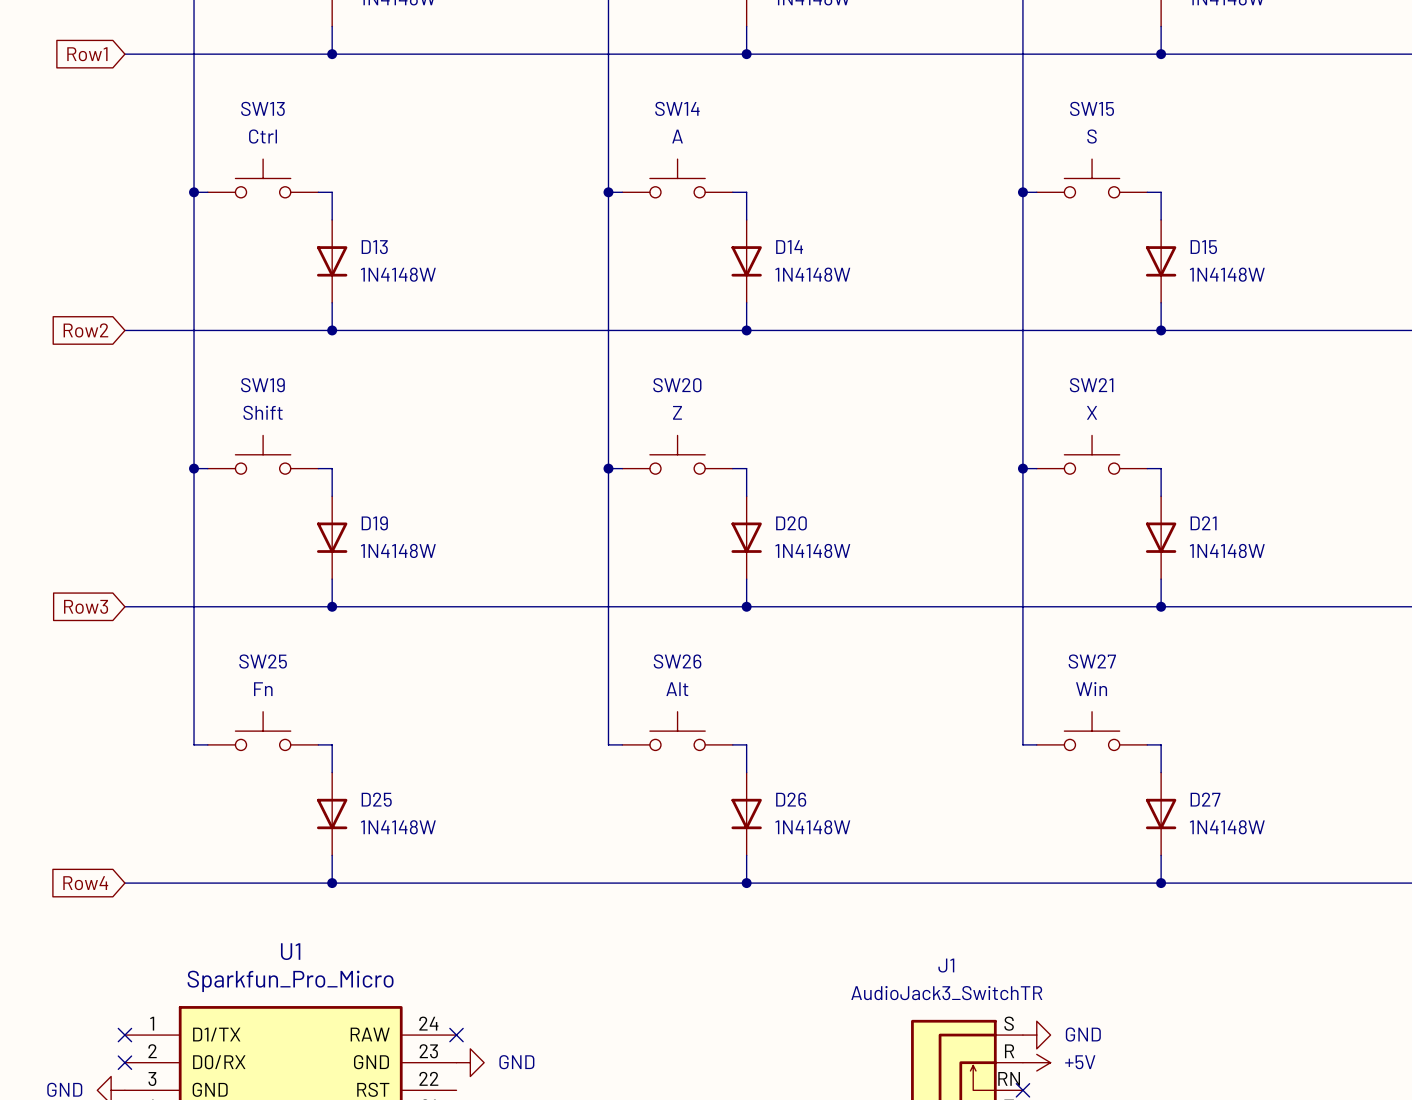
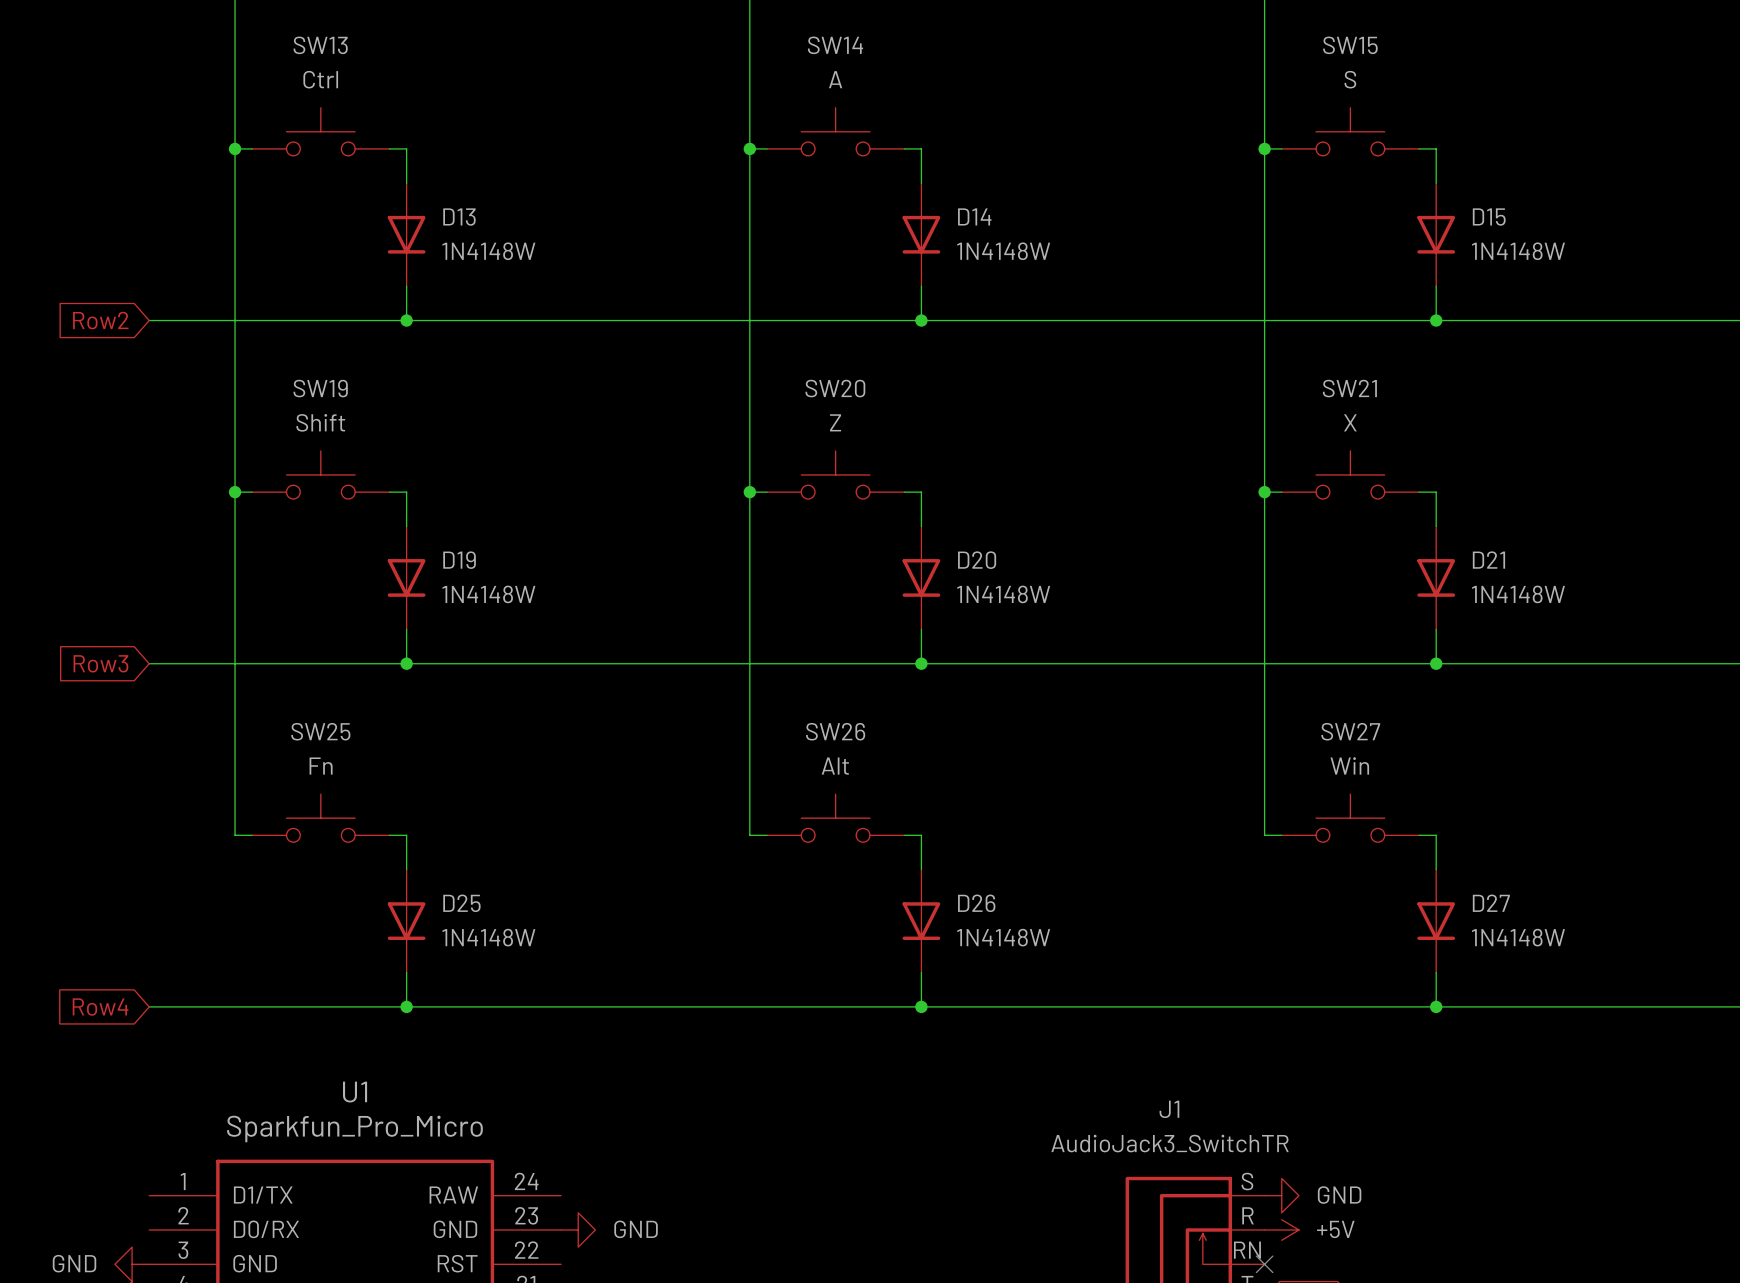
no-connect mark: (124, 1035) -> none
no-connect mark: (456, 1035) -> none
no-connect mark: (124, 1062) -> none

